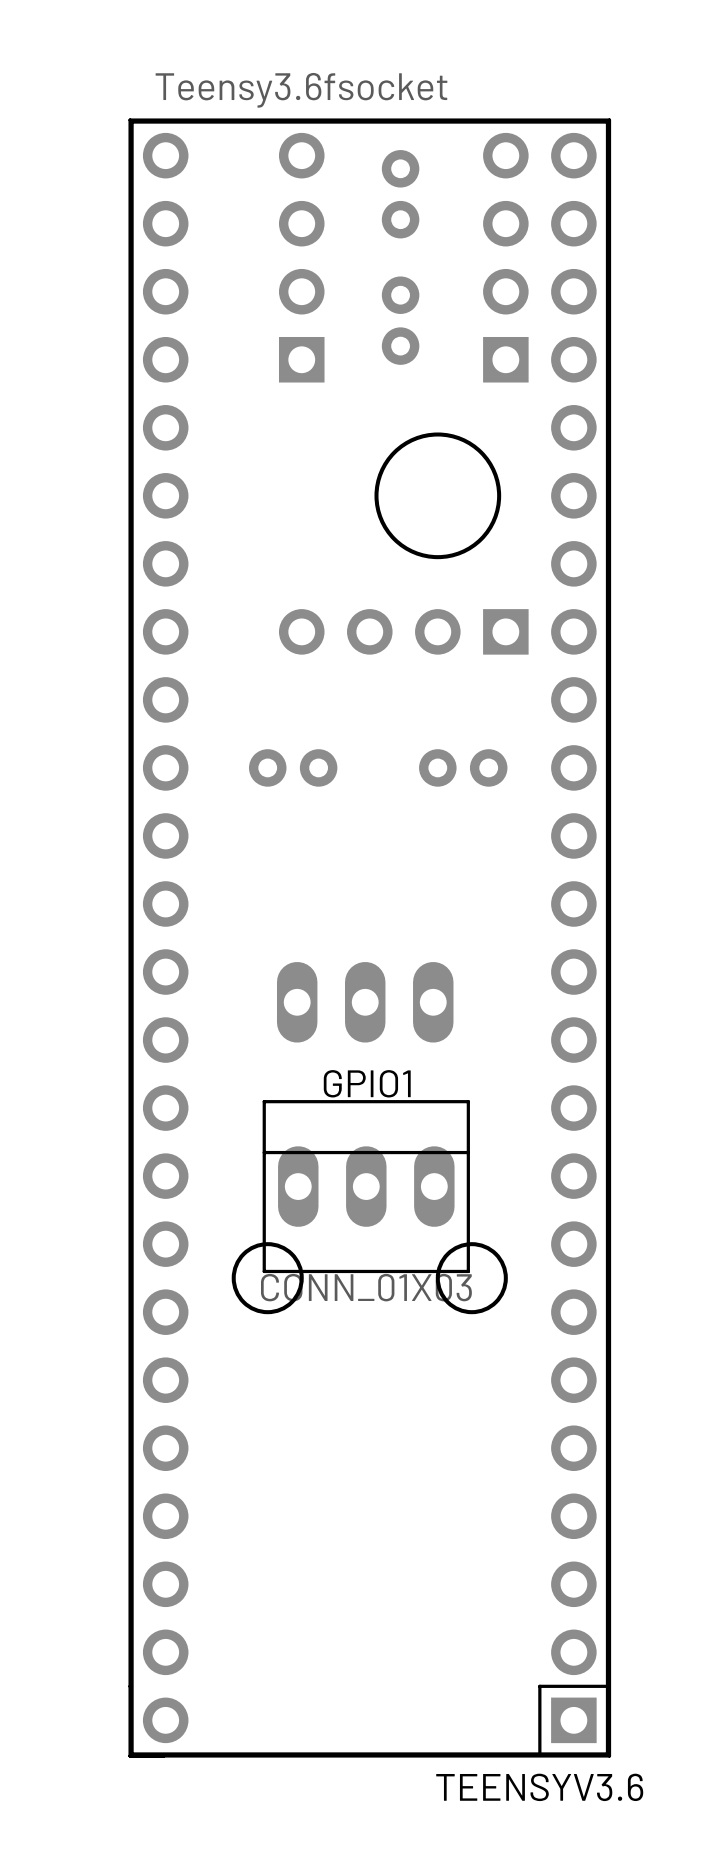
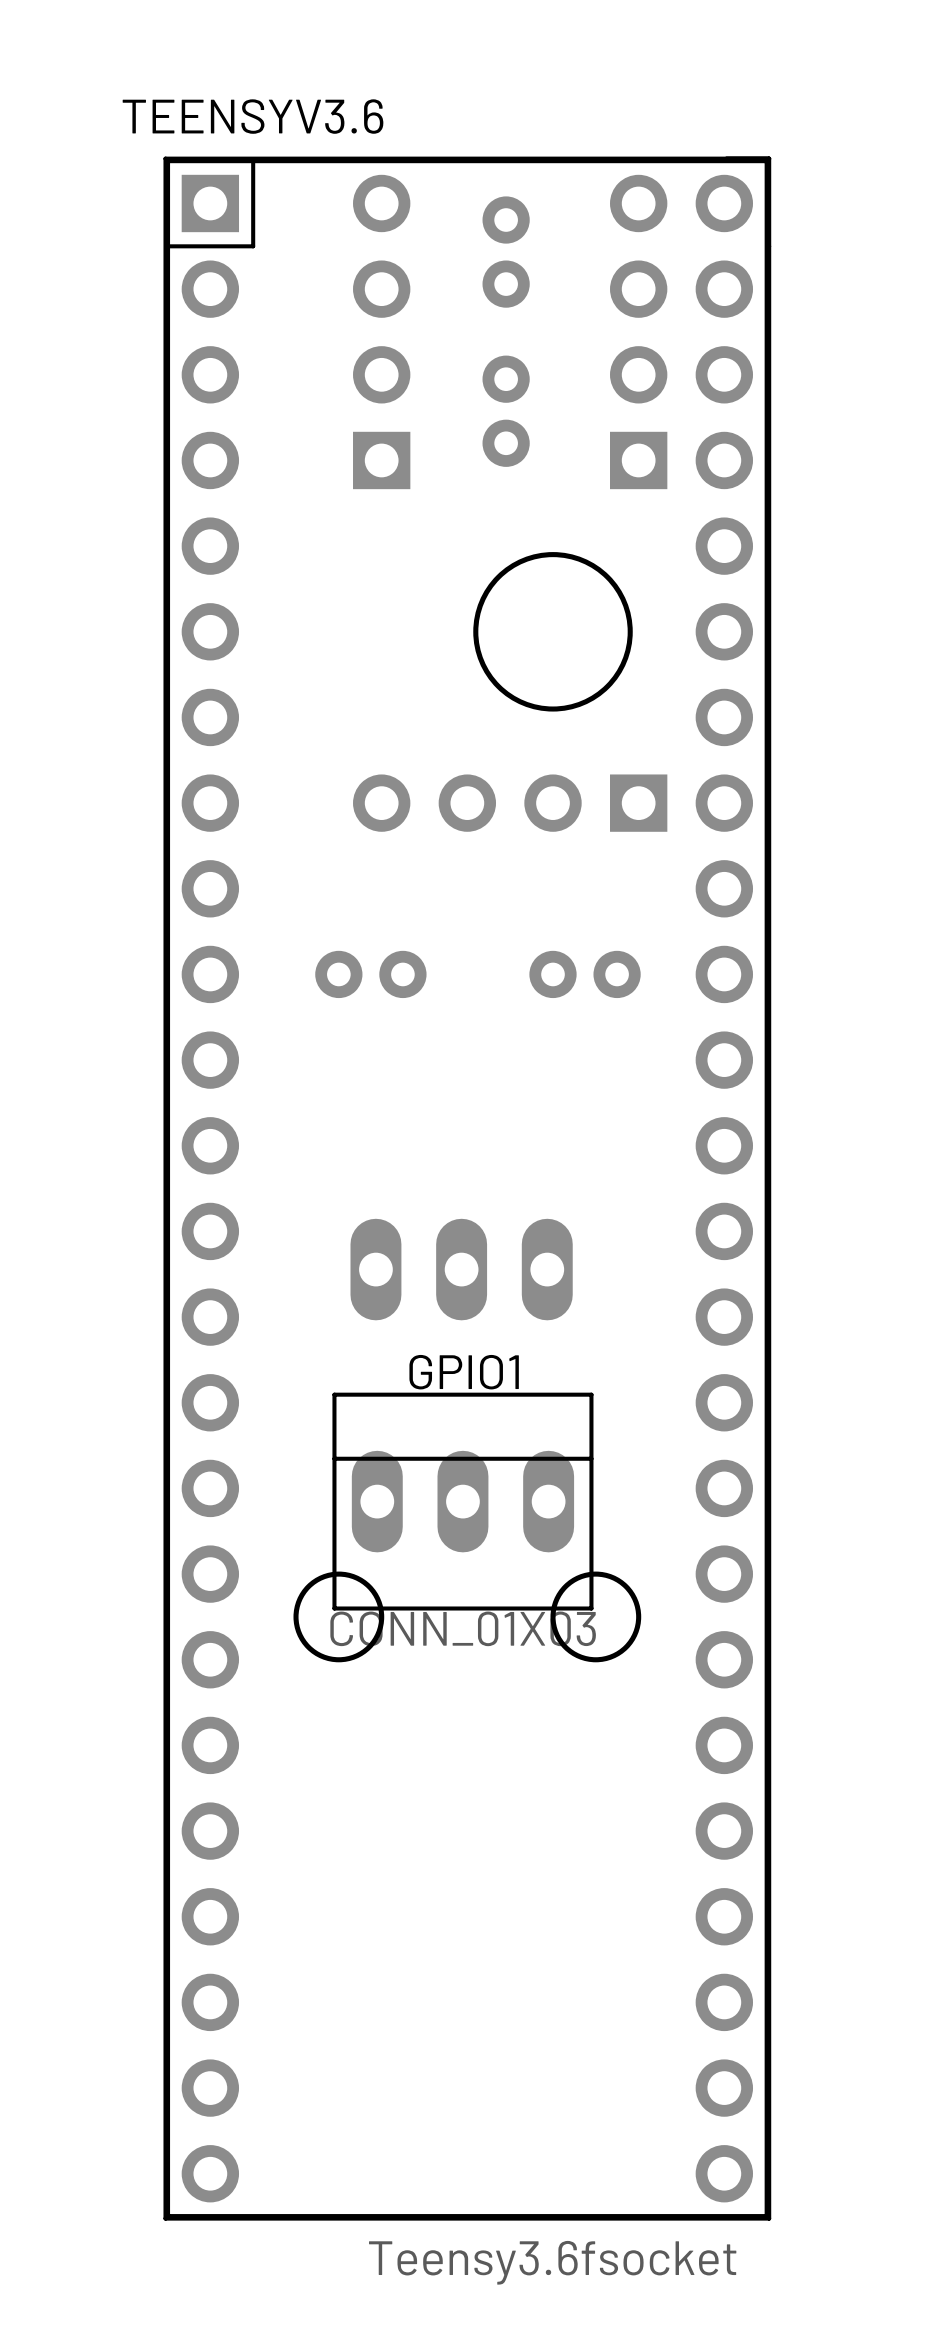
TEENSYV3.6 rotation: 0° (369, 938) -> 180° (467, 1188)

